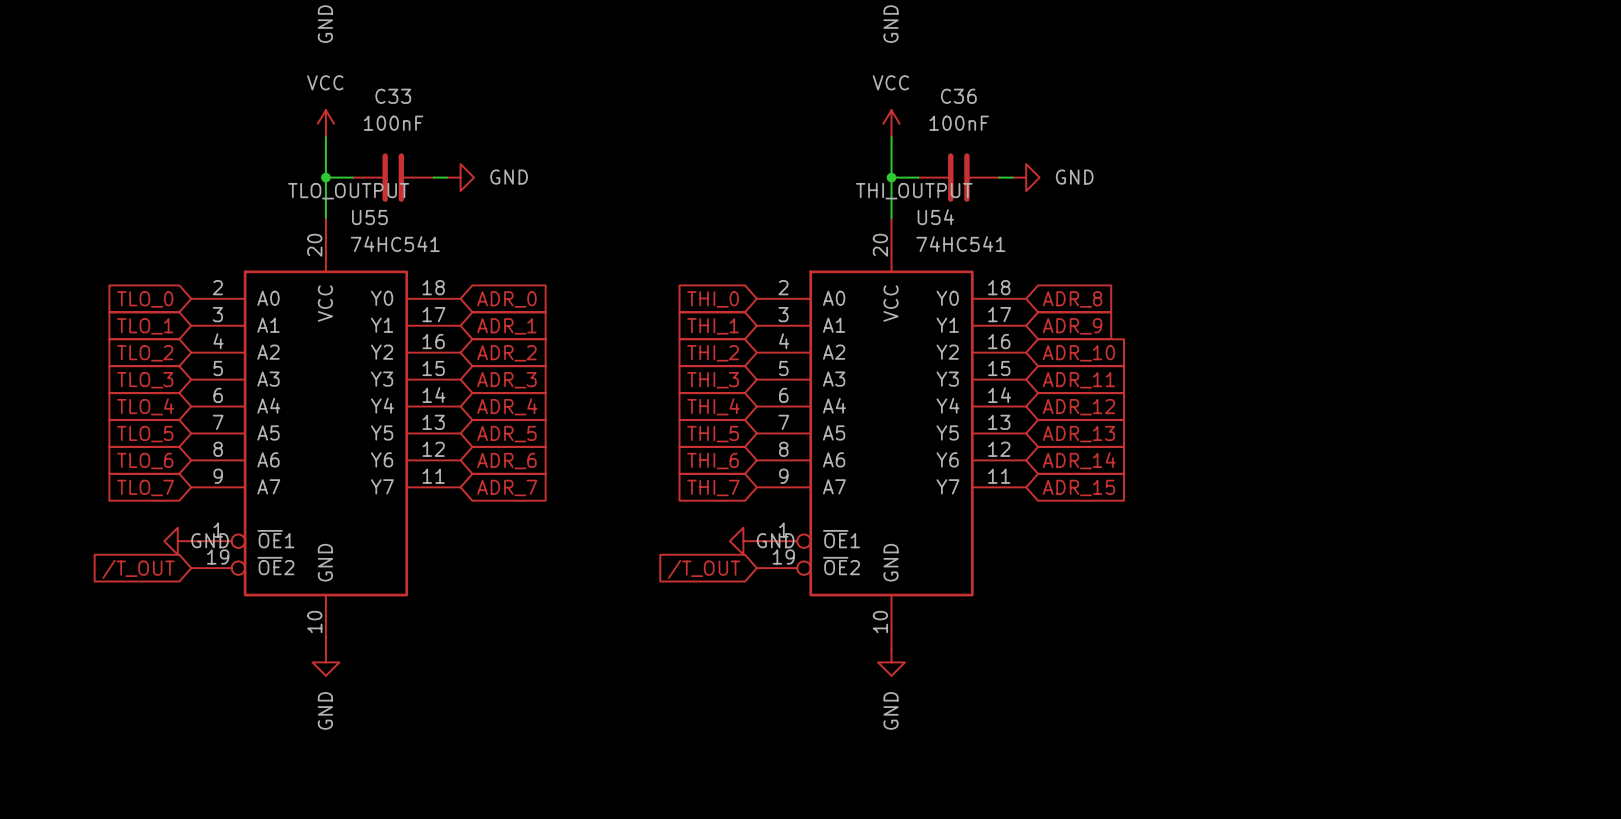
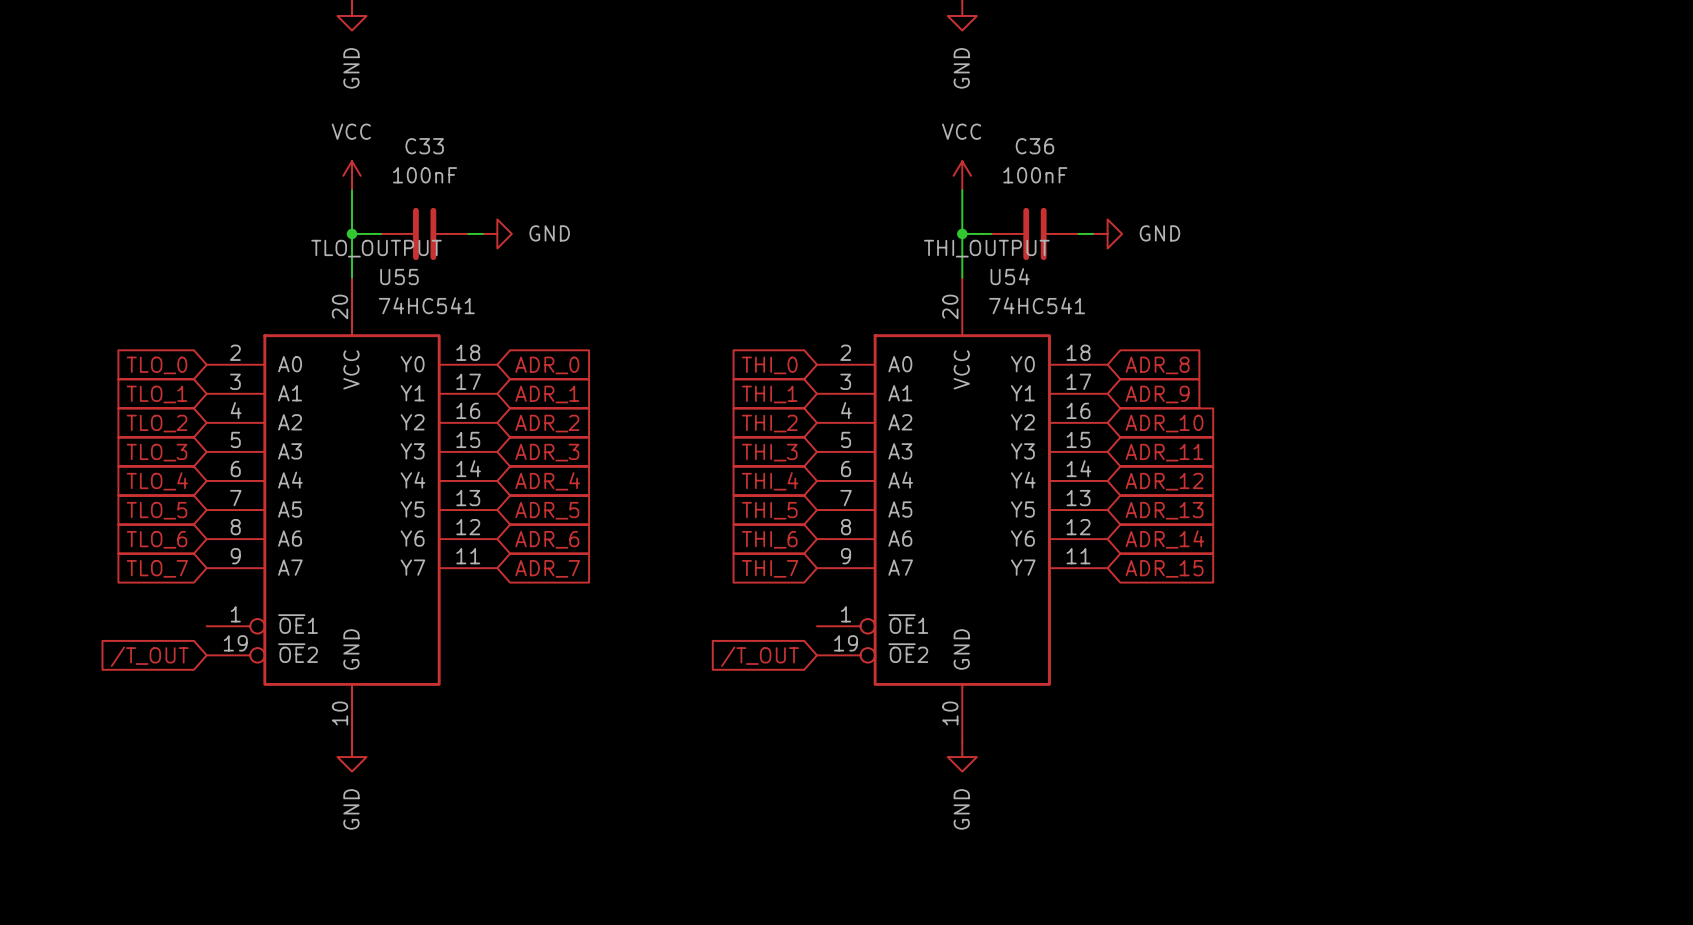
power symbol: GND (177, 541) -> none
power symbol: GND (743, 541) -> none

